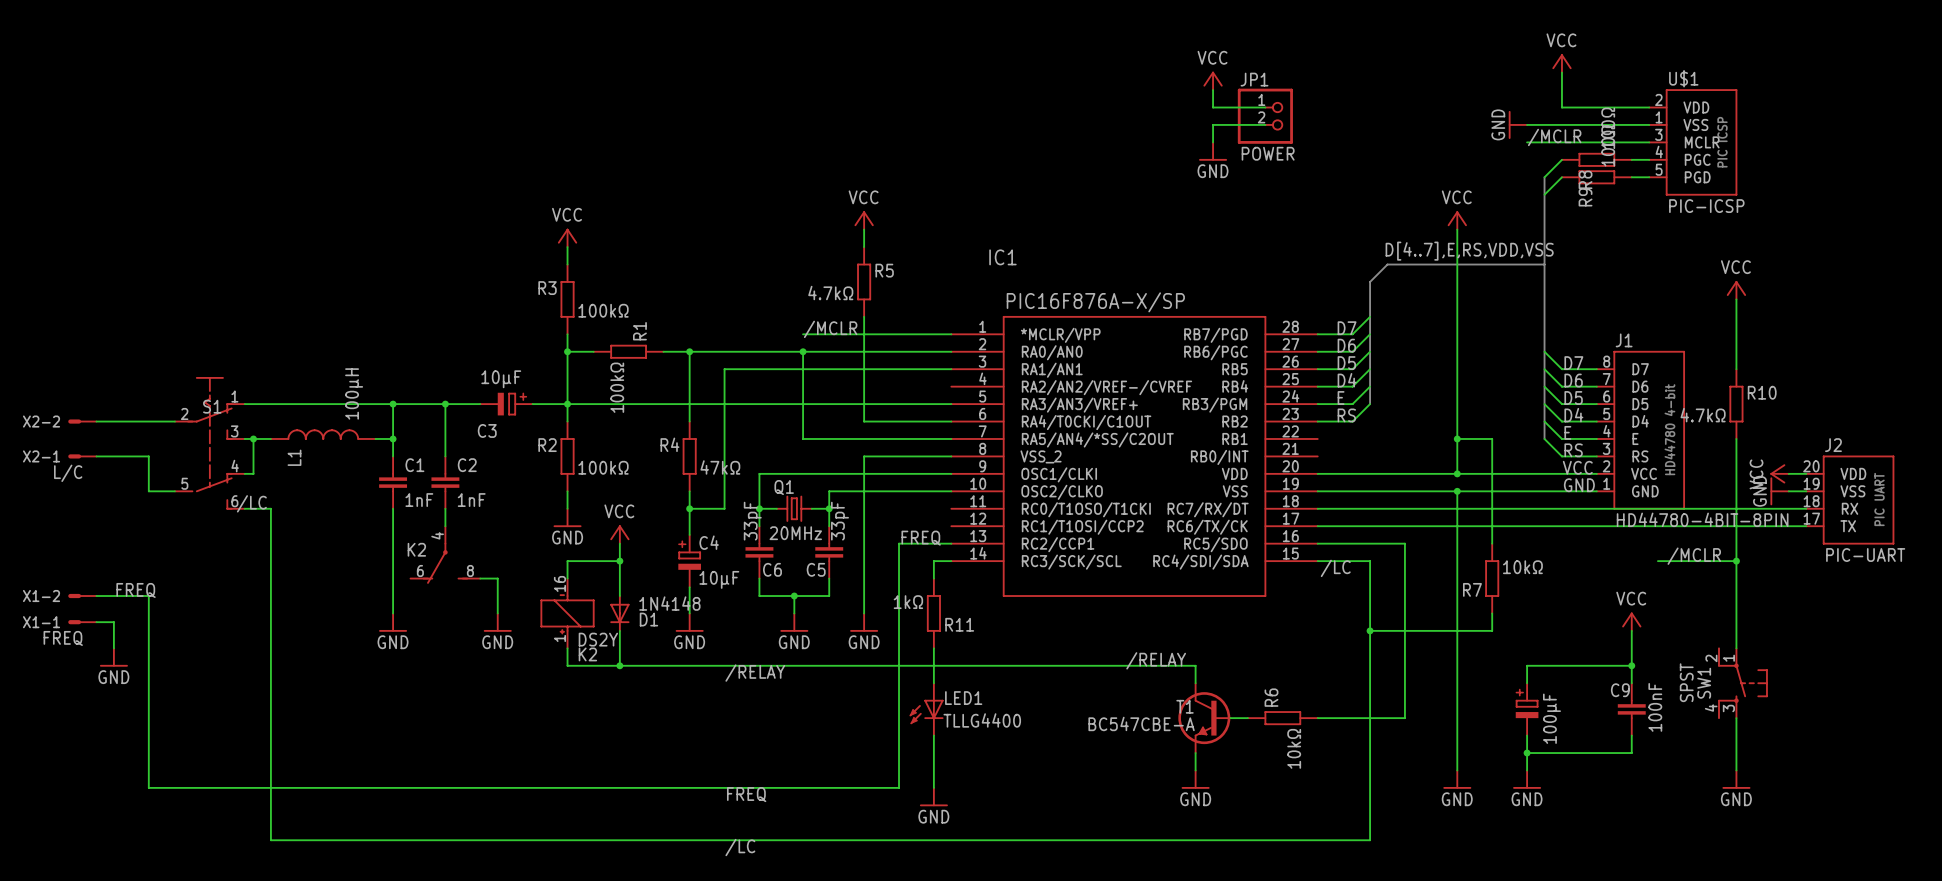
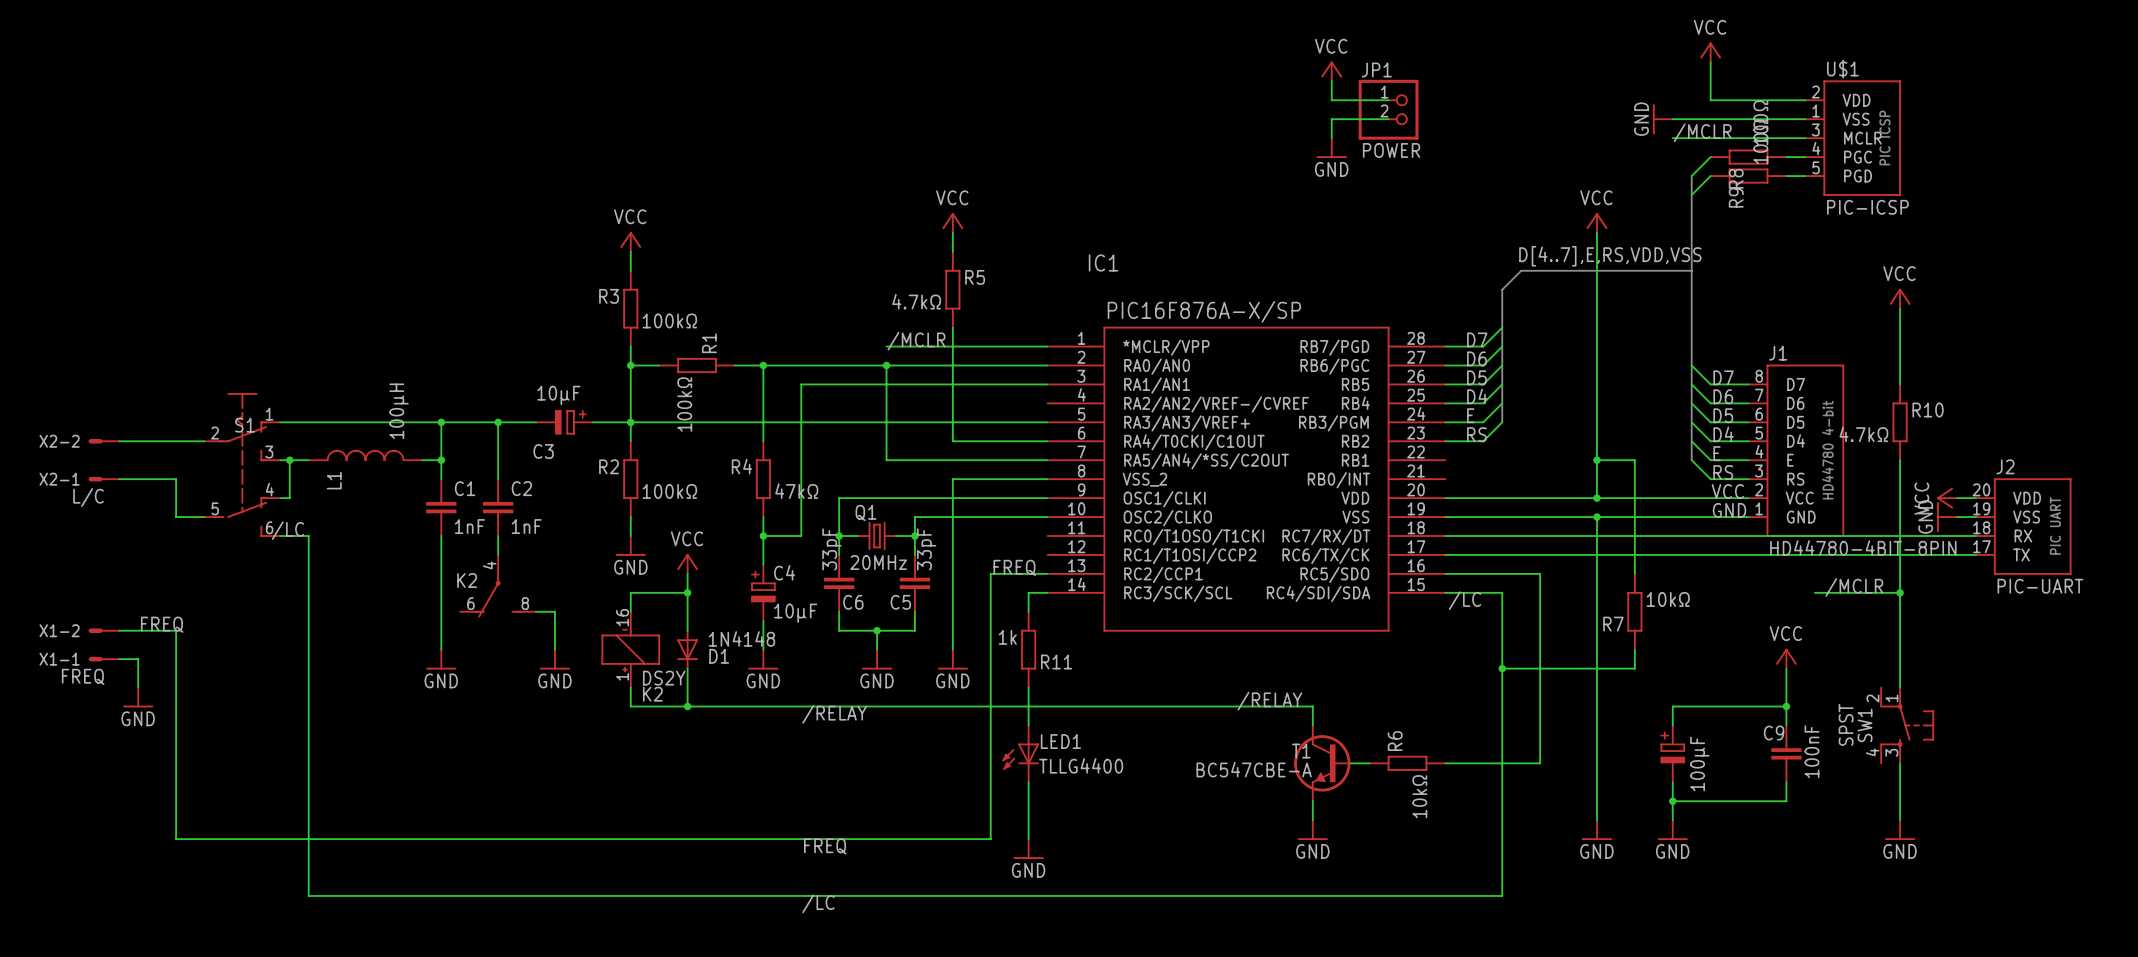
R11 value: 1kΩ (908, 602) -> 1k (1007, 637)

